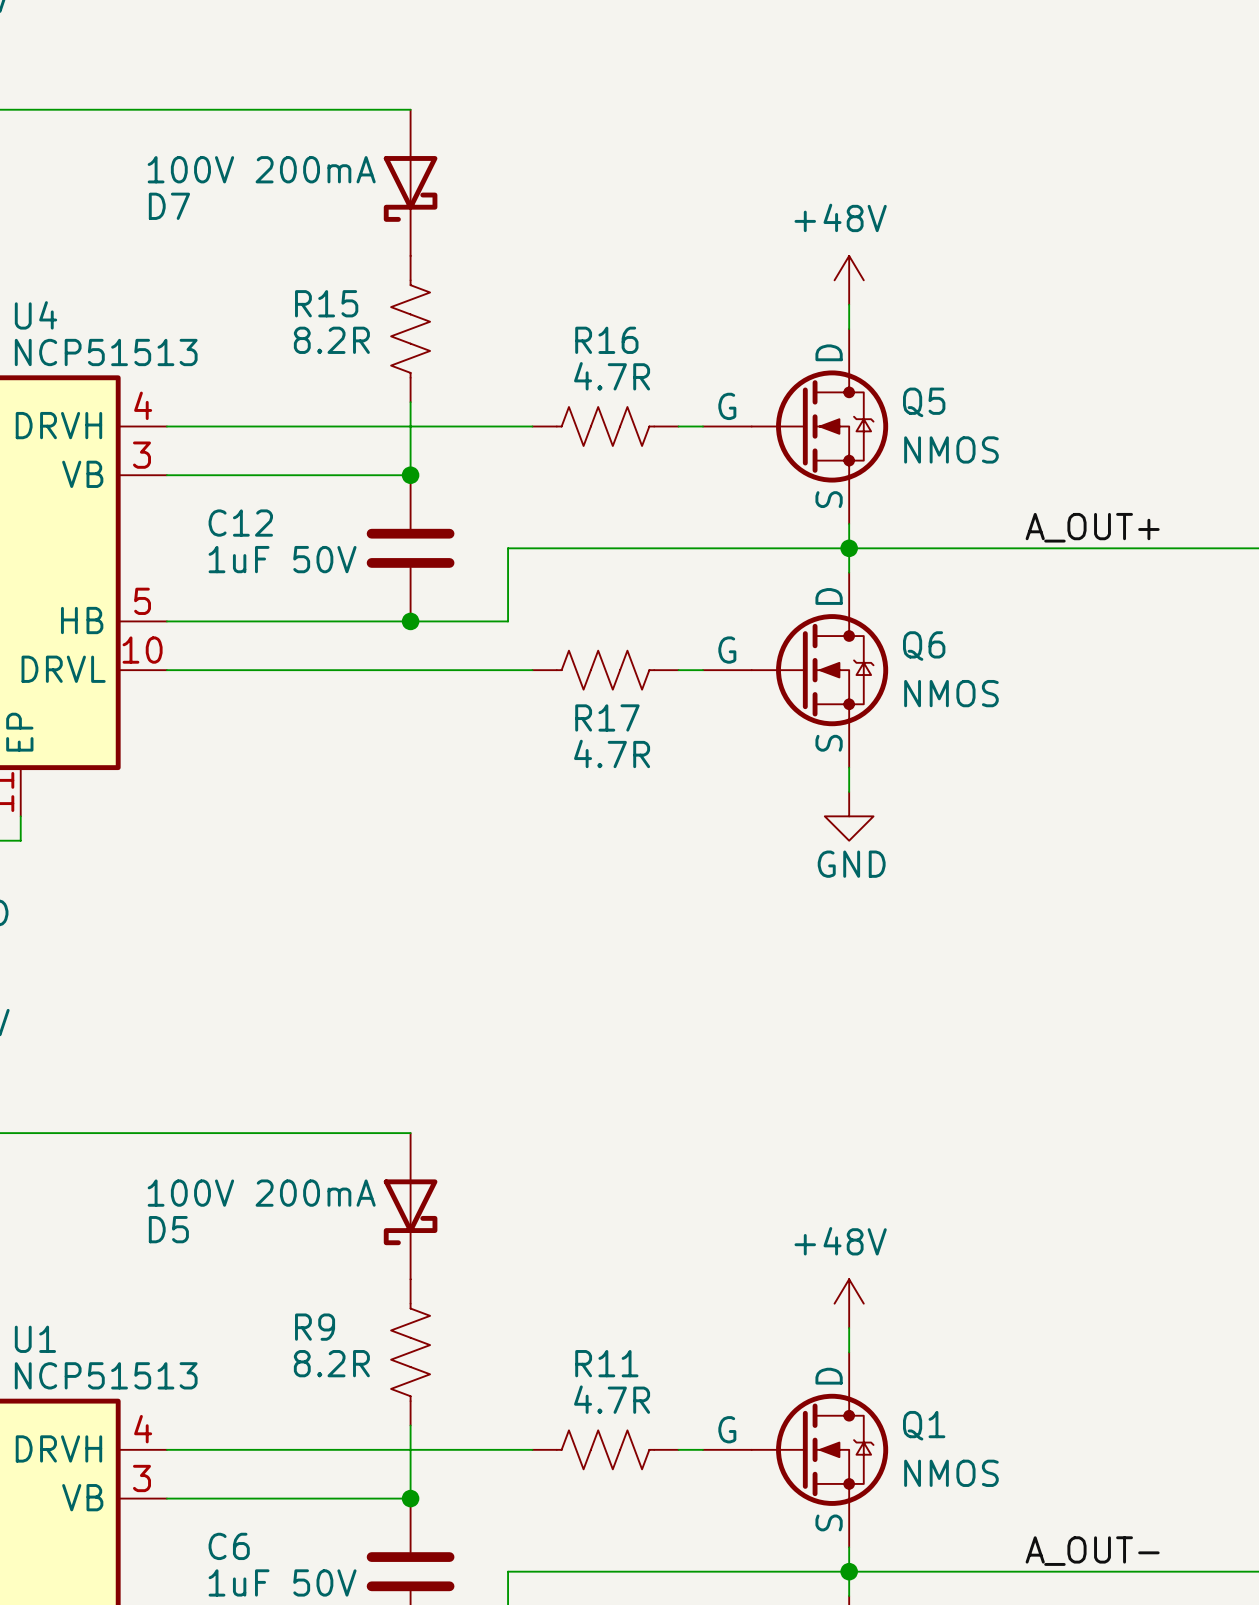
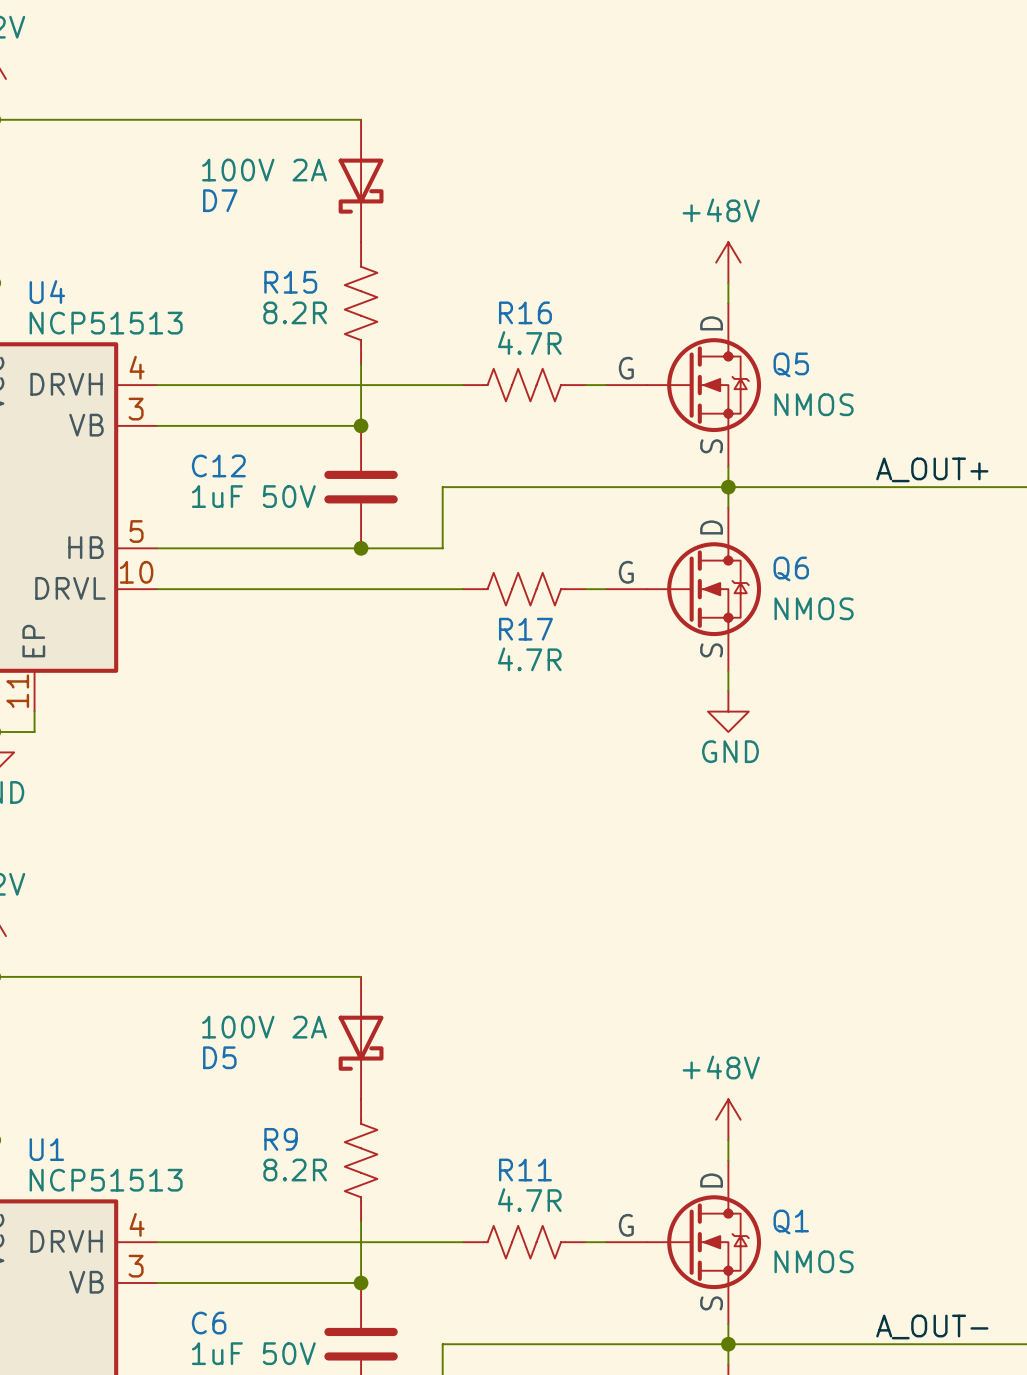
D7 value: 100V 200mA (261, 169) -> 100V 2A (264, 170)
D7 name position: D7 (169, 206) -> D7 (220, 200)
D5 value: 100V 200mA (261, 1193) -> 100V 2A (264, 1027)
D5 name position: D5 (168, 1229) -> D5 (219, 1057)

